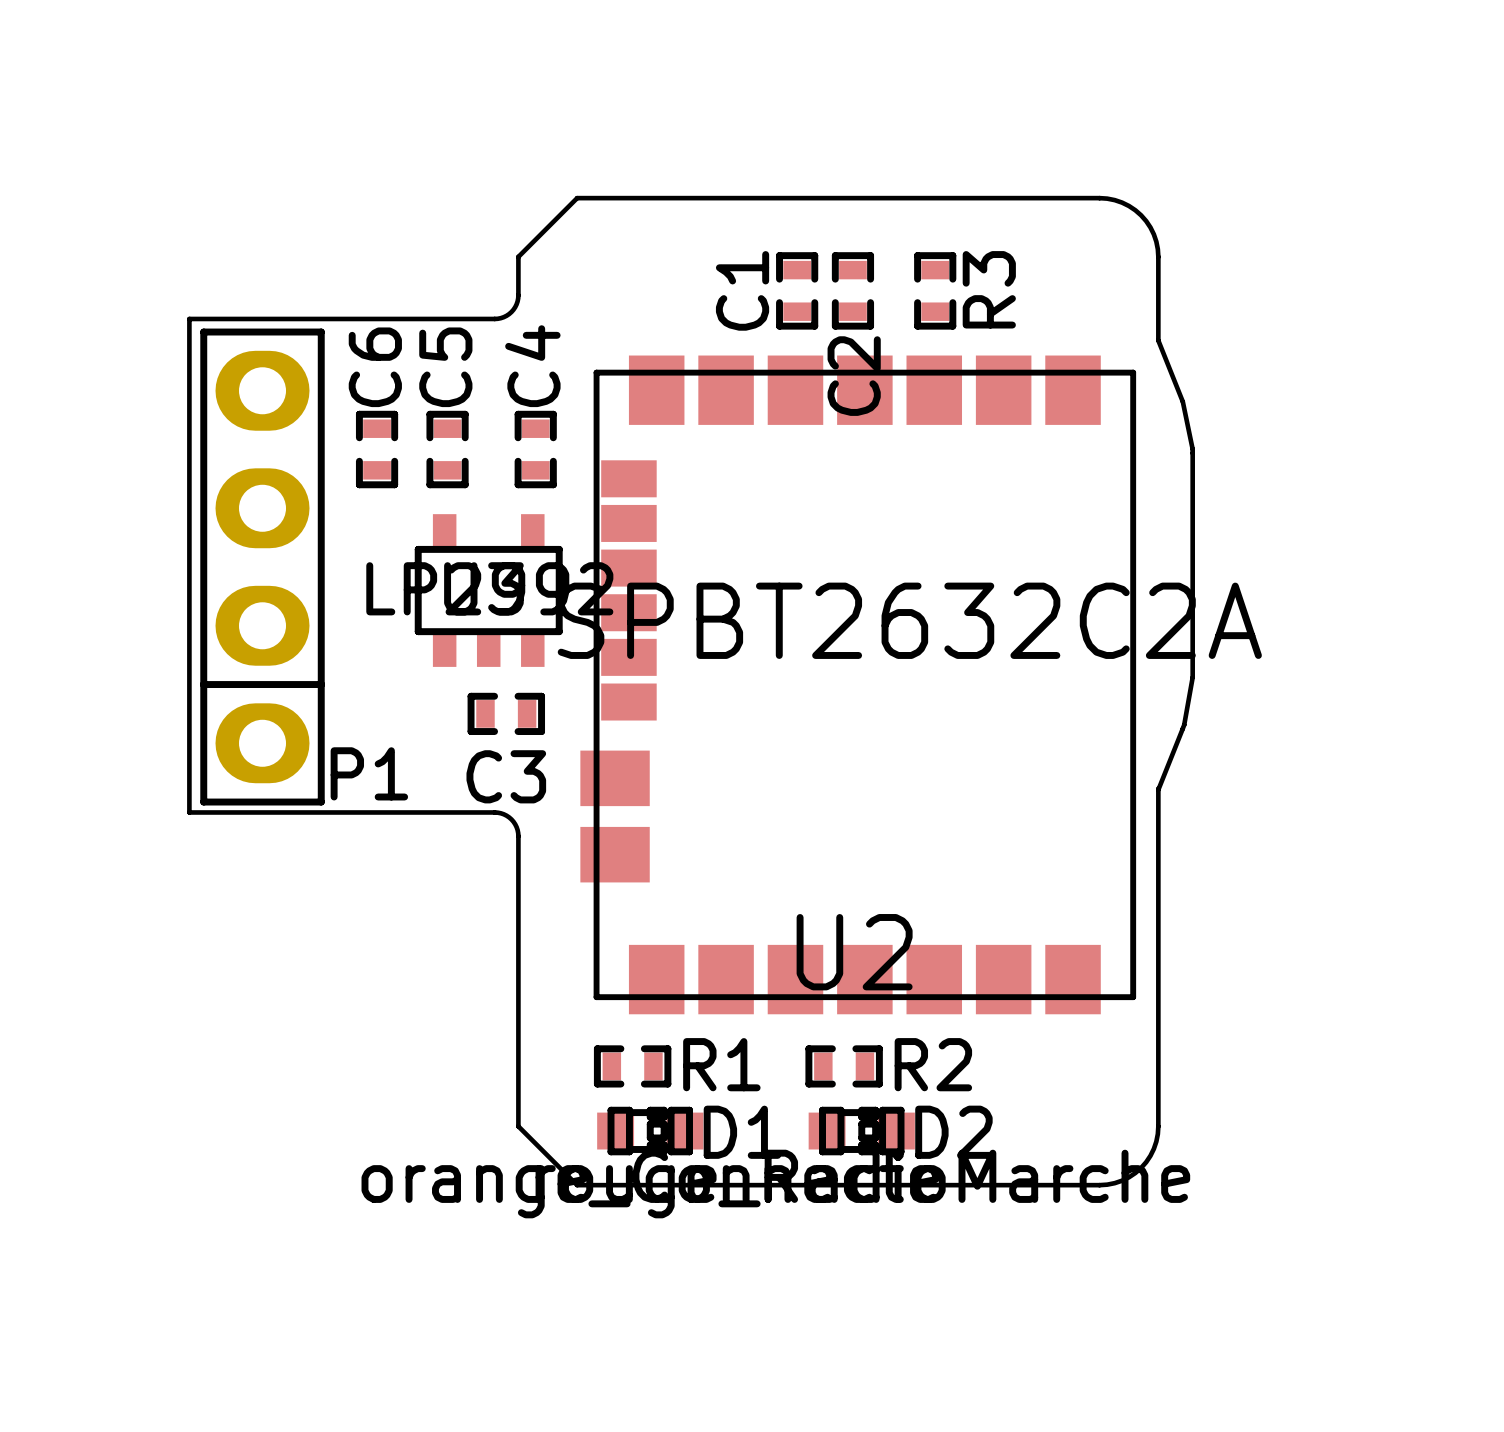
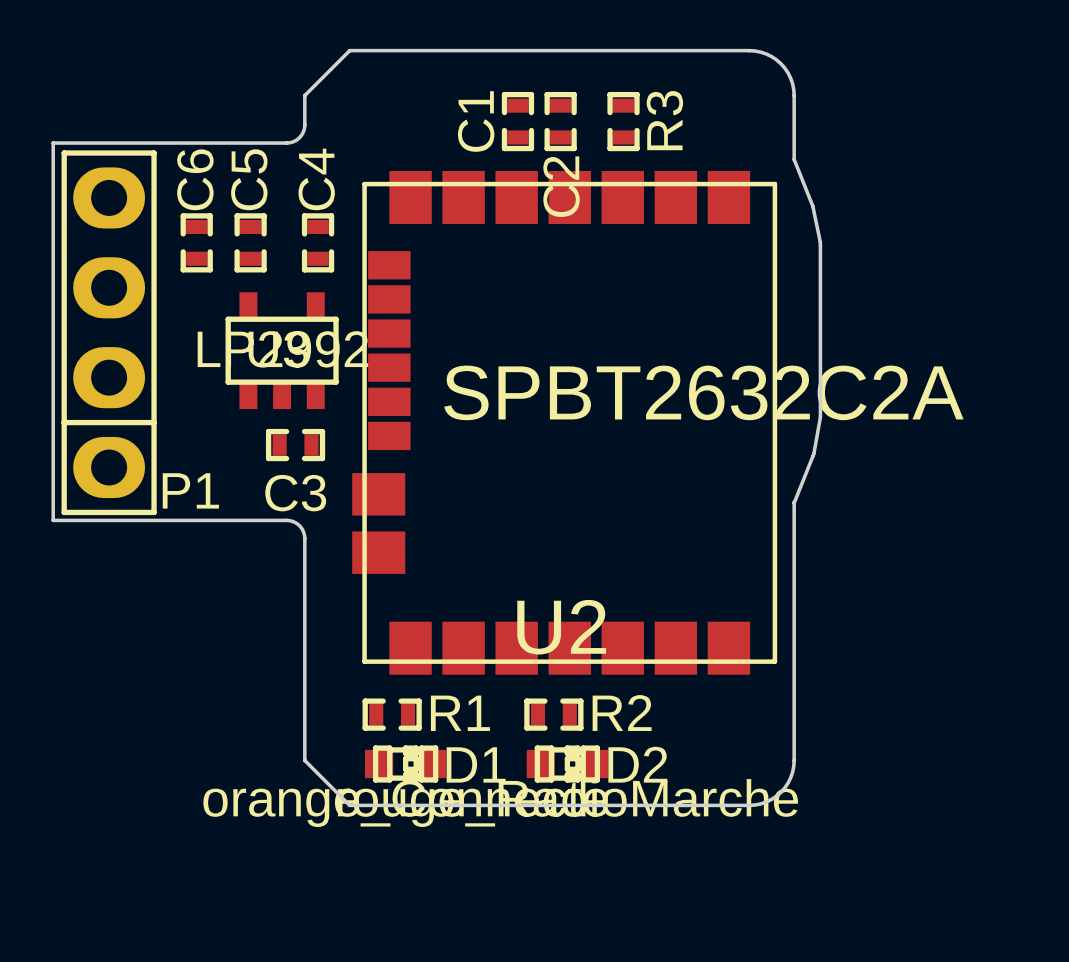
U2 value position: SPBT2632C2A (909, 620) -> SPBT2632C2A (703, 392)

